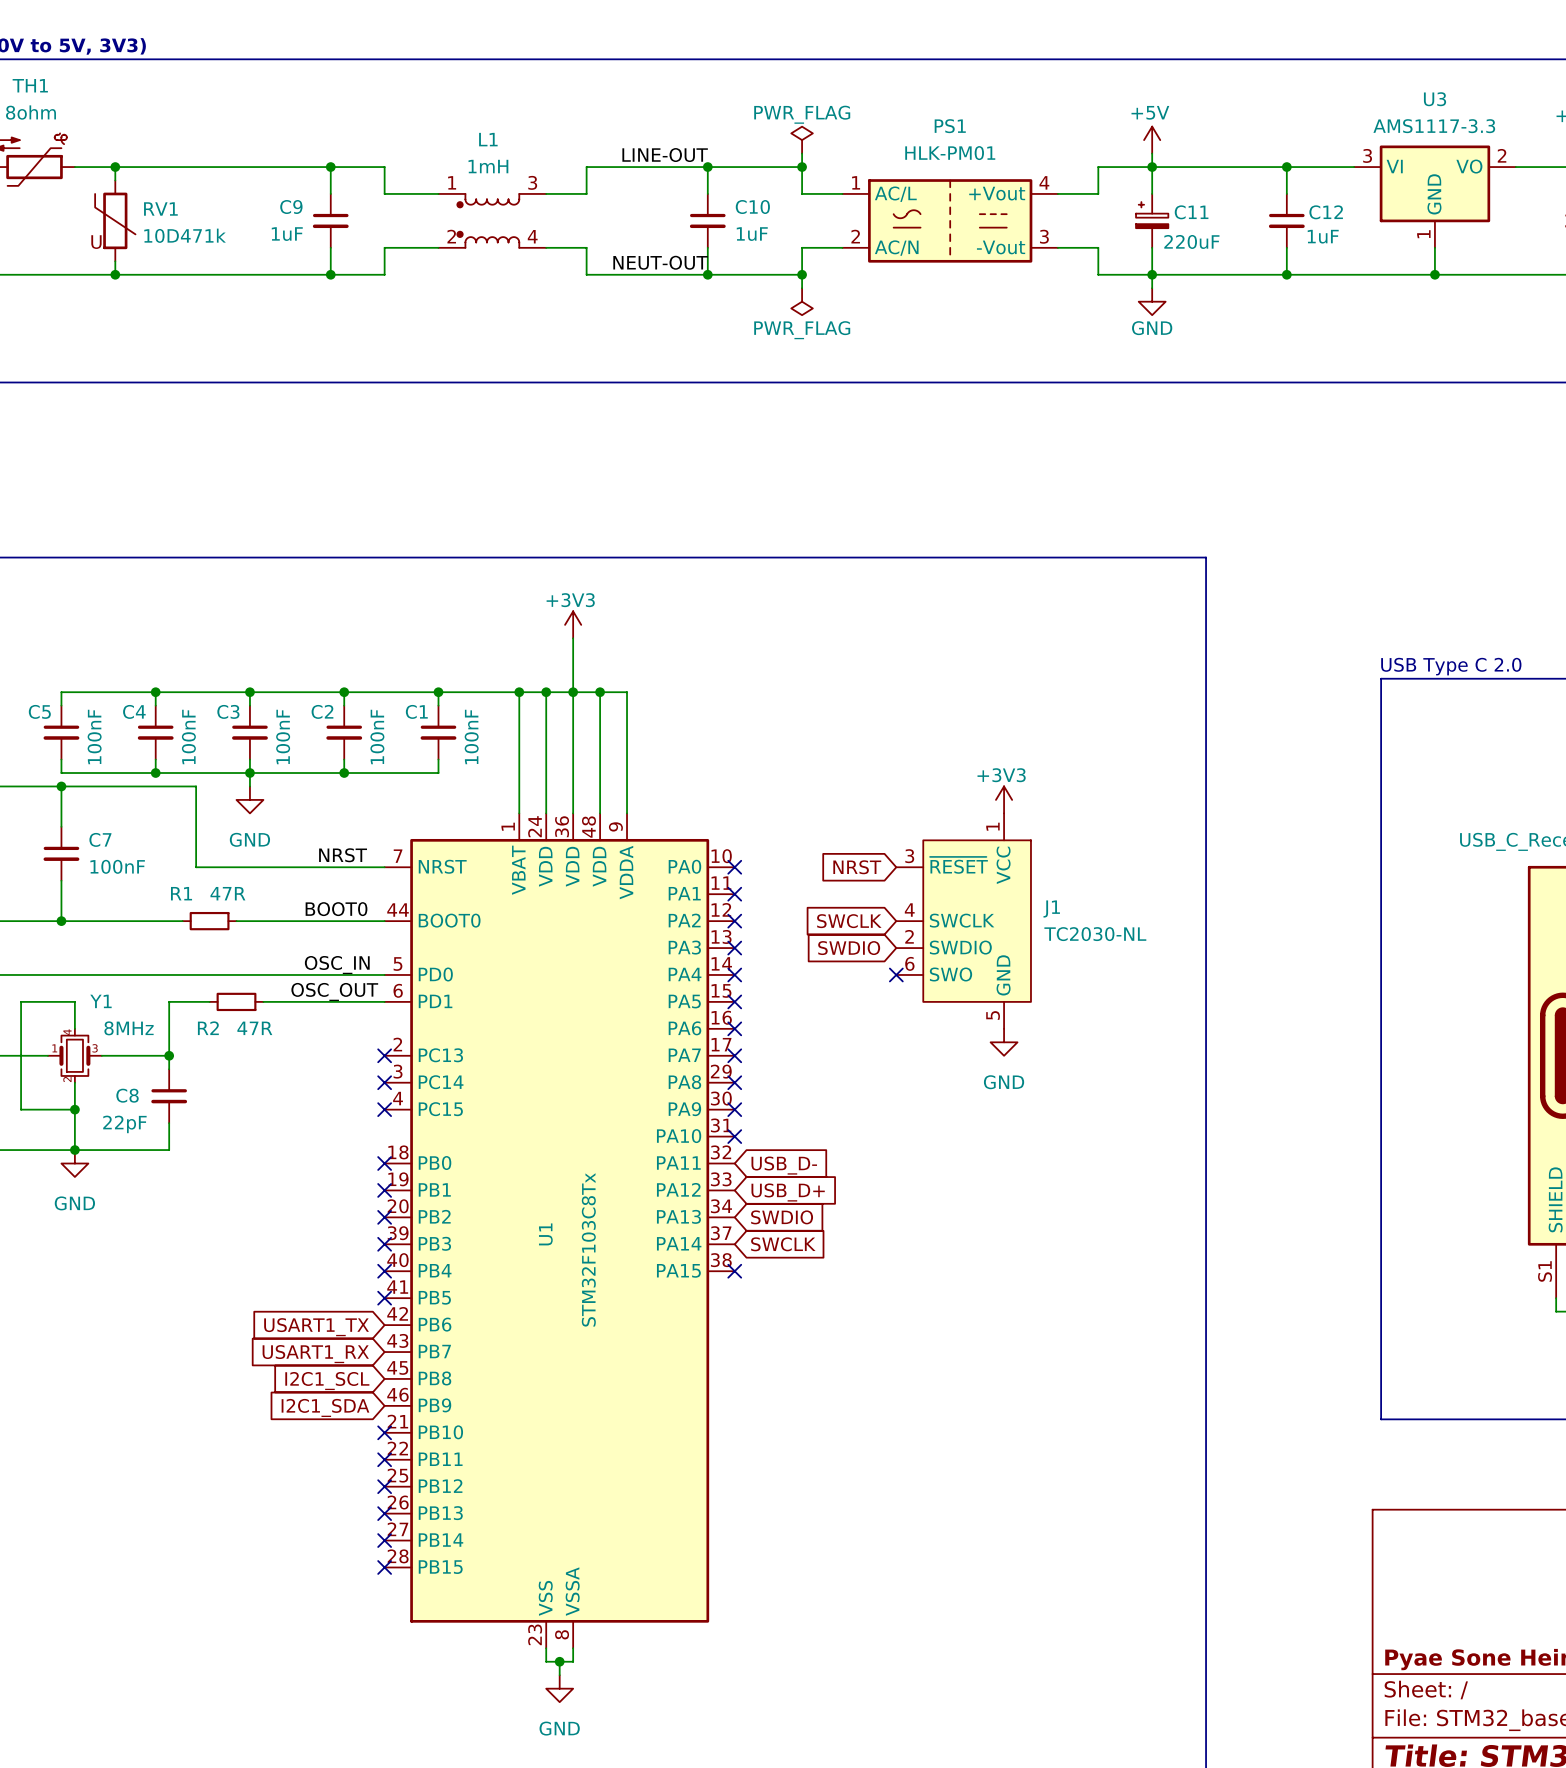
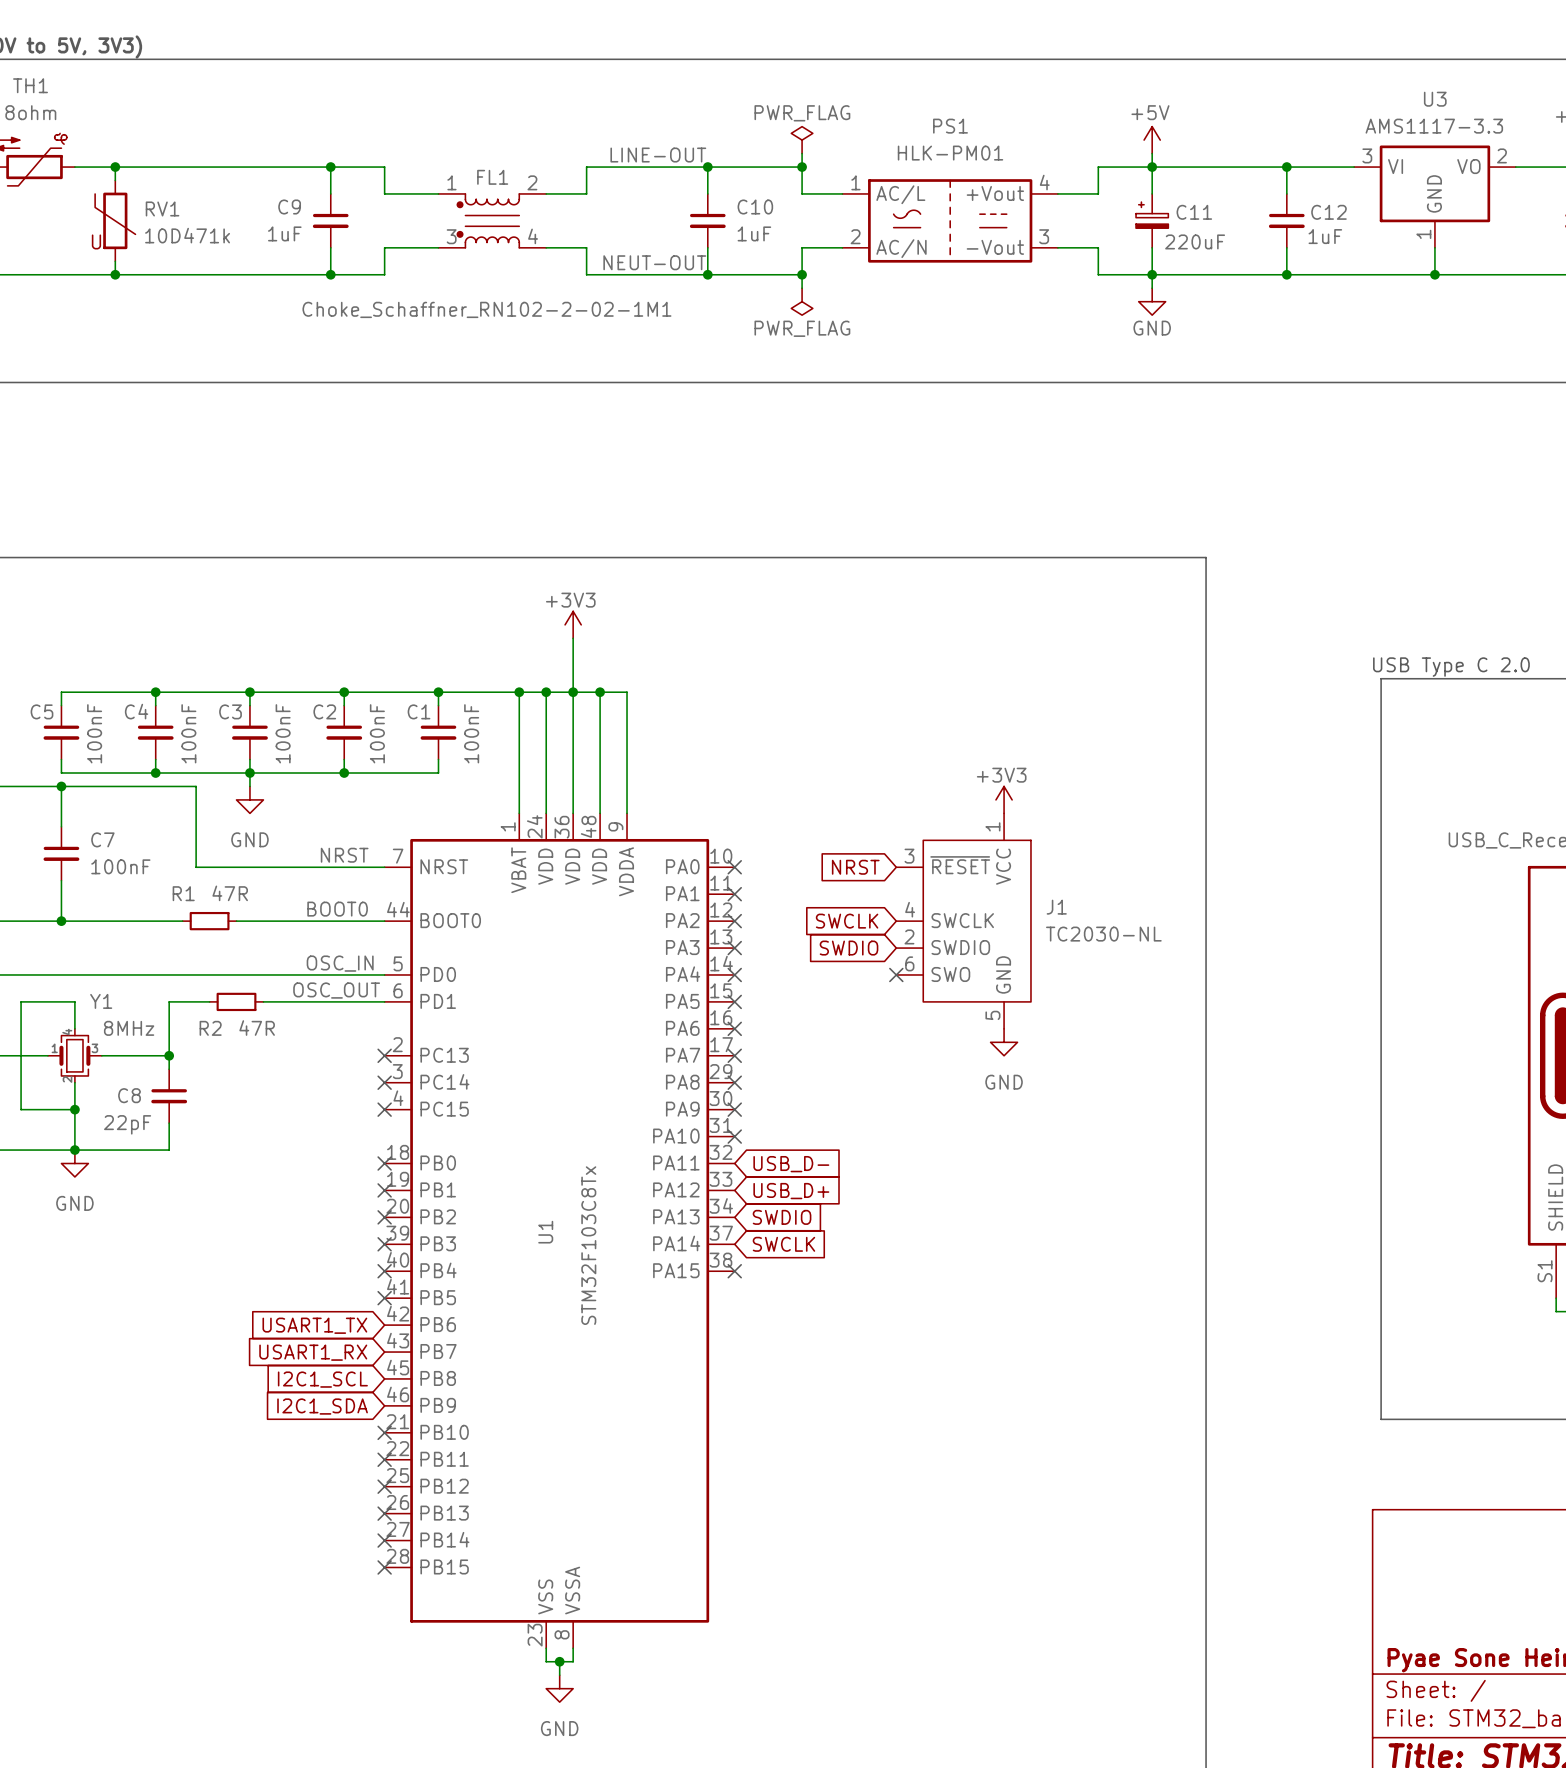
L1: 1mH (492, 220) -> none
FL1: none -> Choke_Schaffner_RN102-2-02-1M1 (492, 220)

